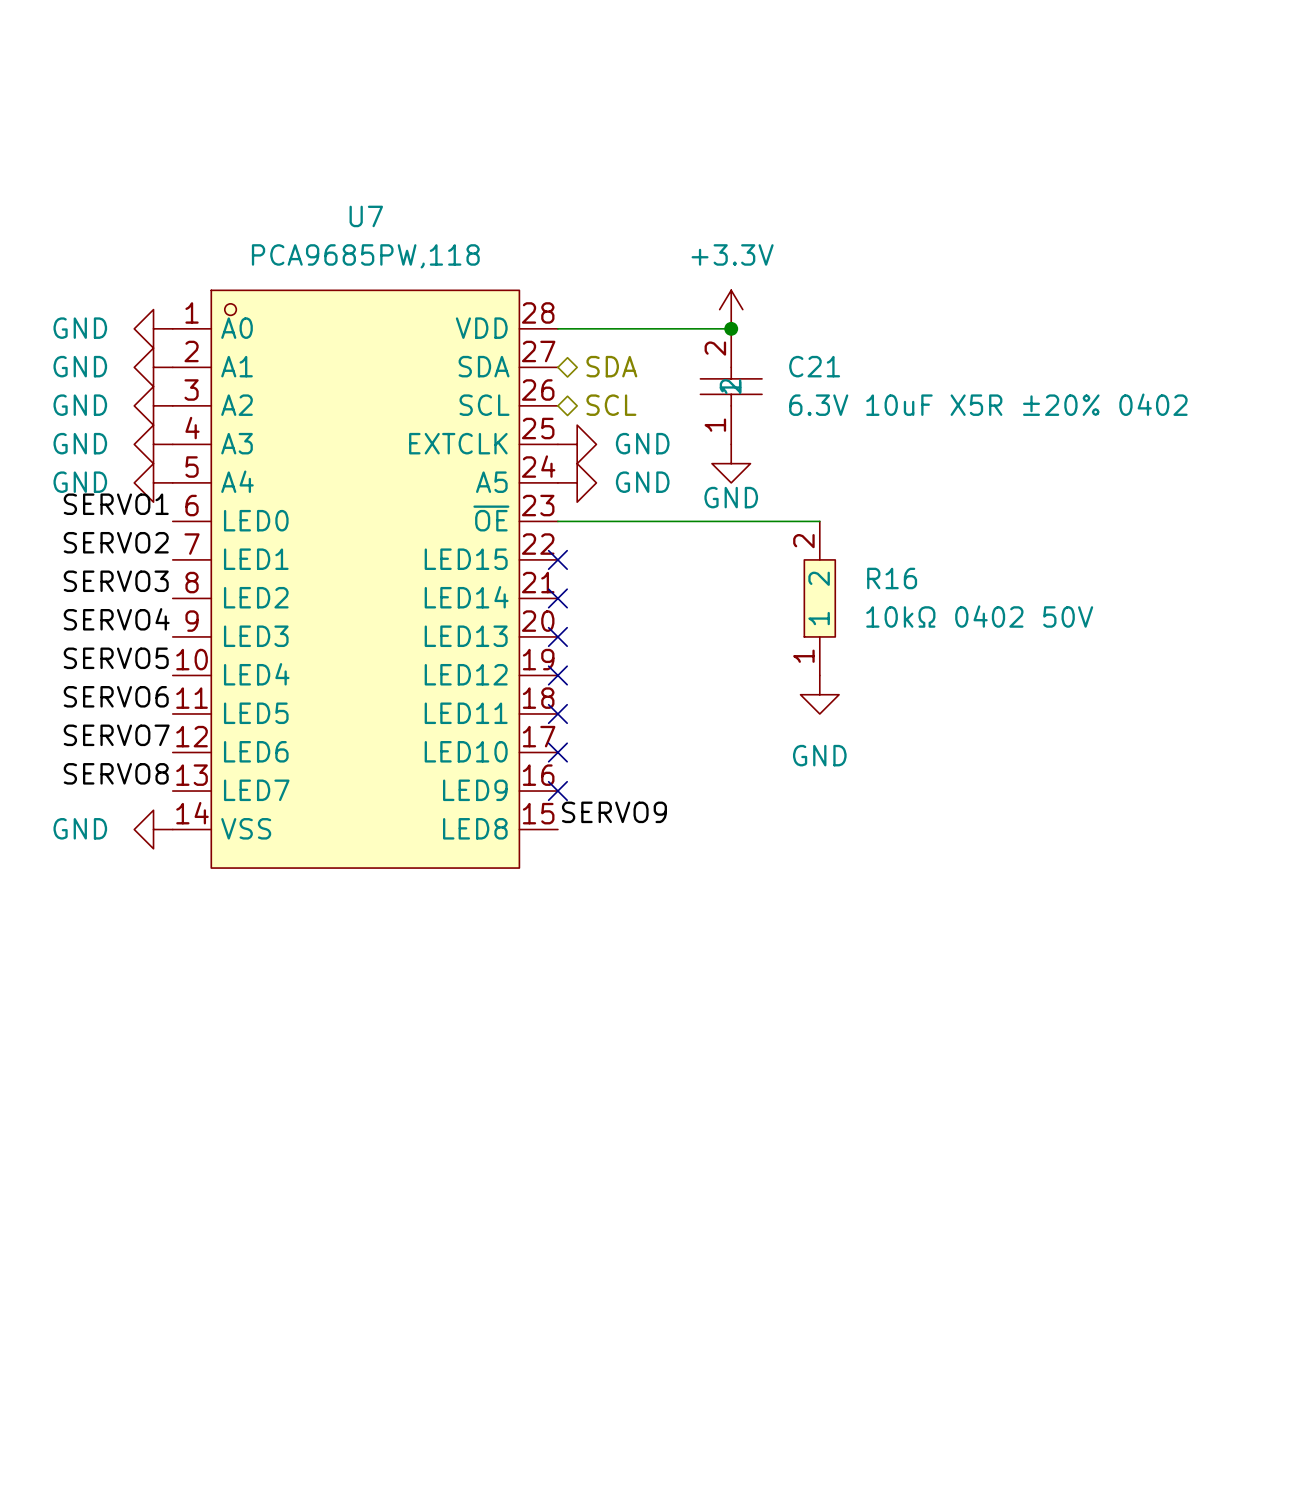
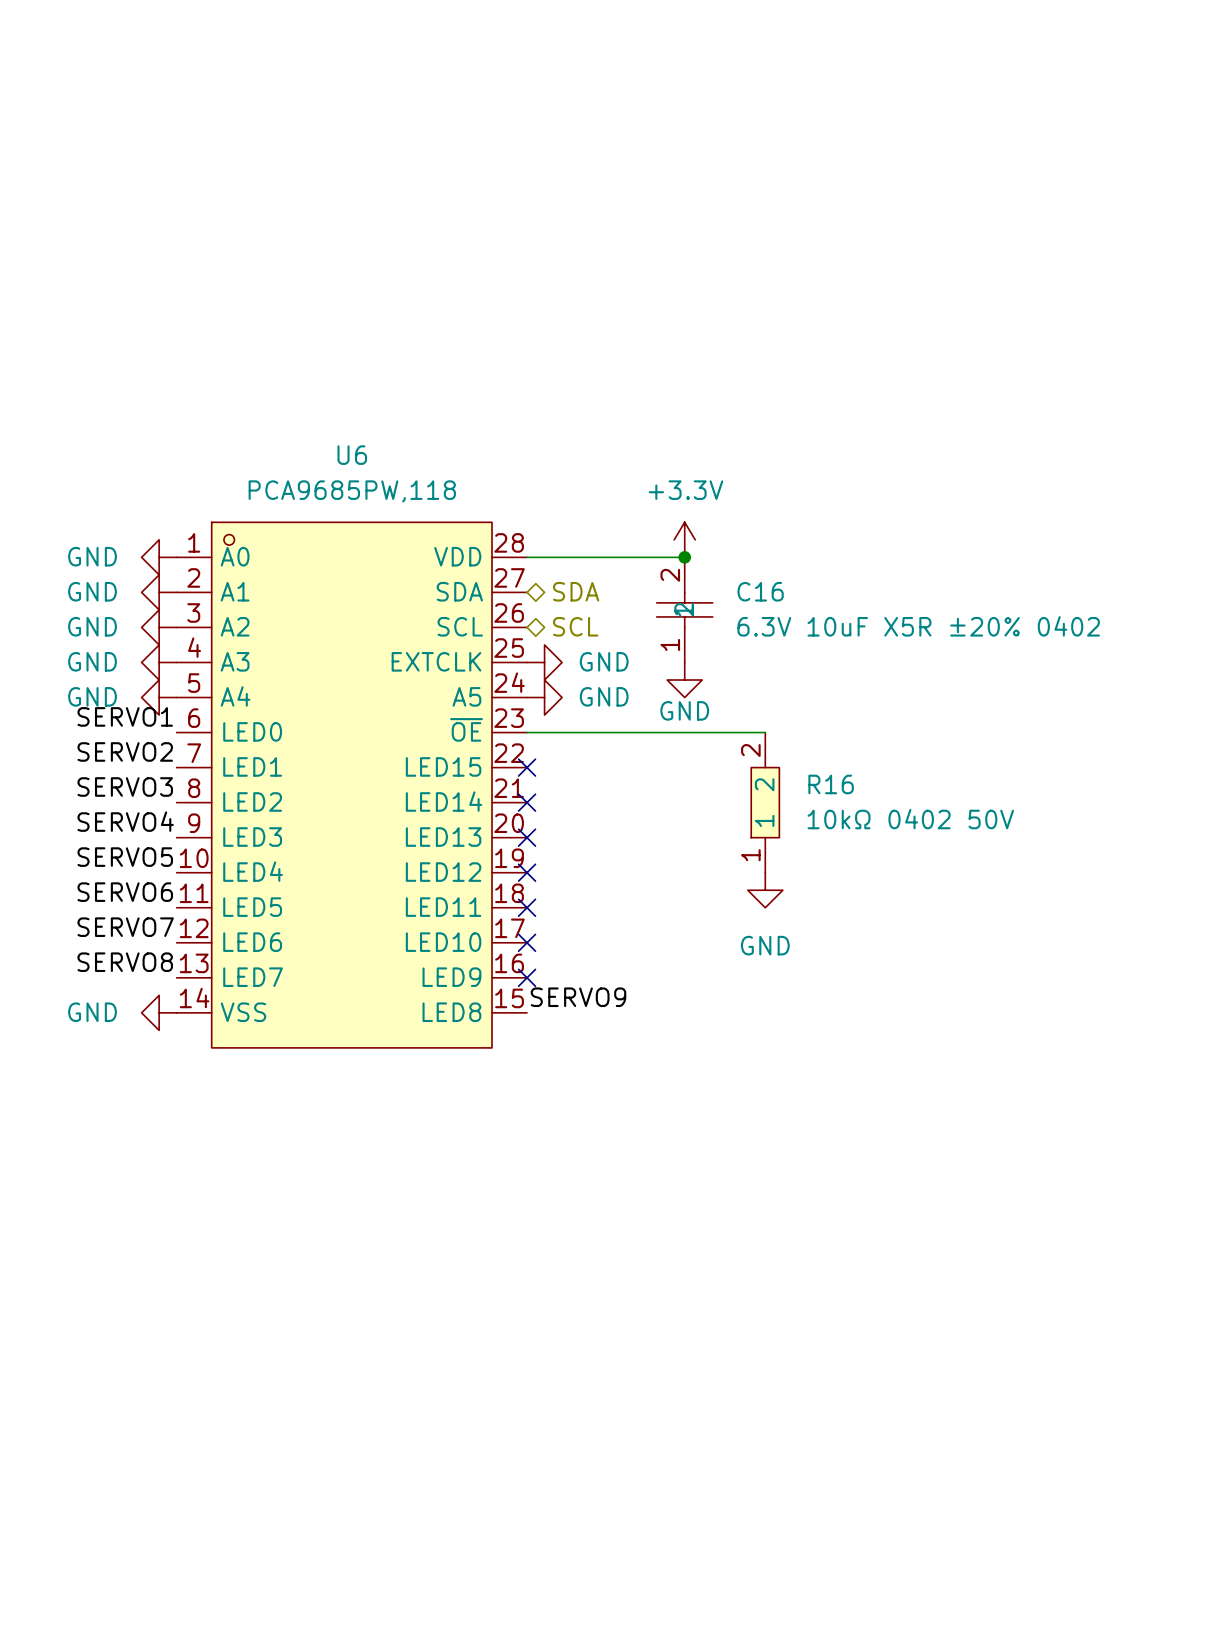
U7 name: U7 (366, 216) -> U6 (352, 455)
C21 name: C21 (814, 366) -> C16 (760, 591)

